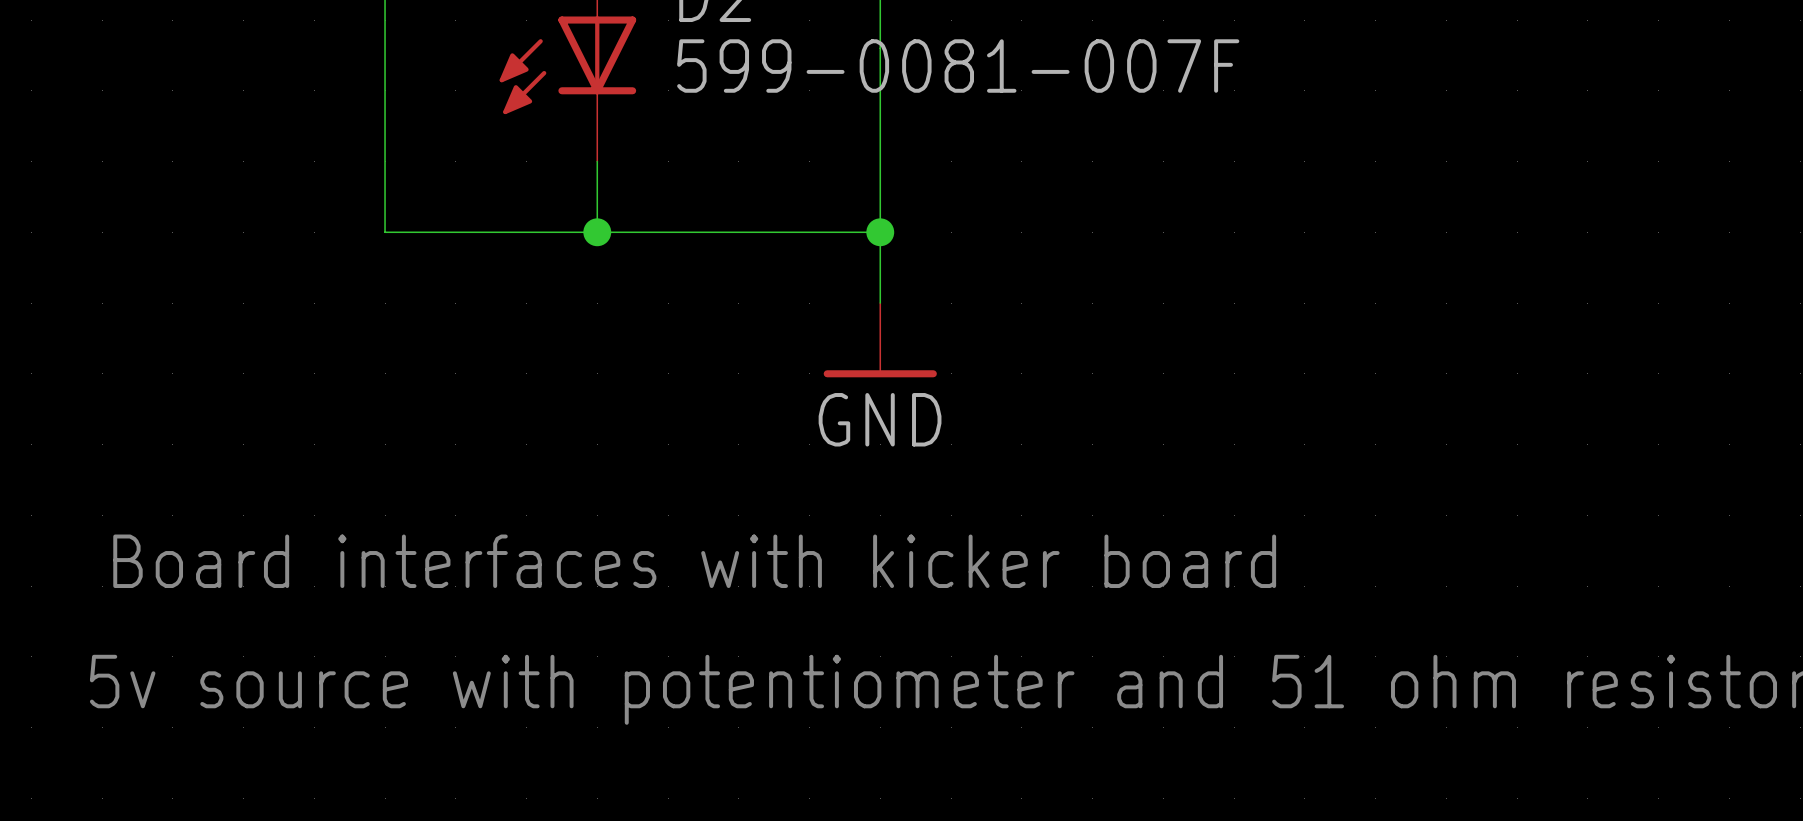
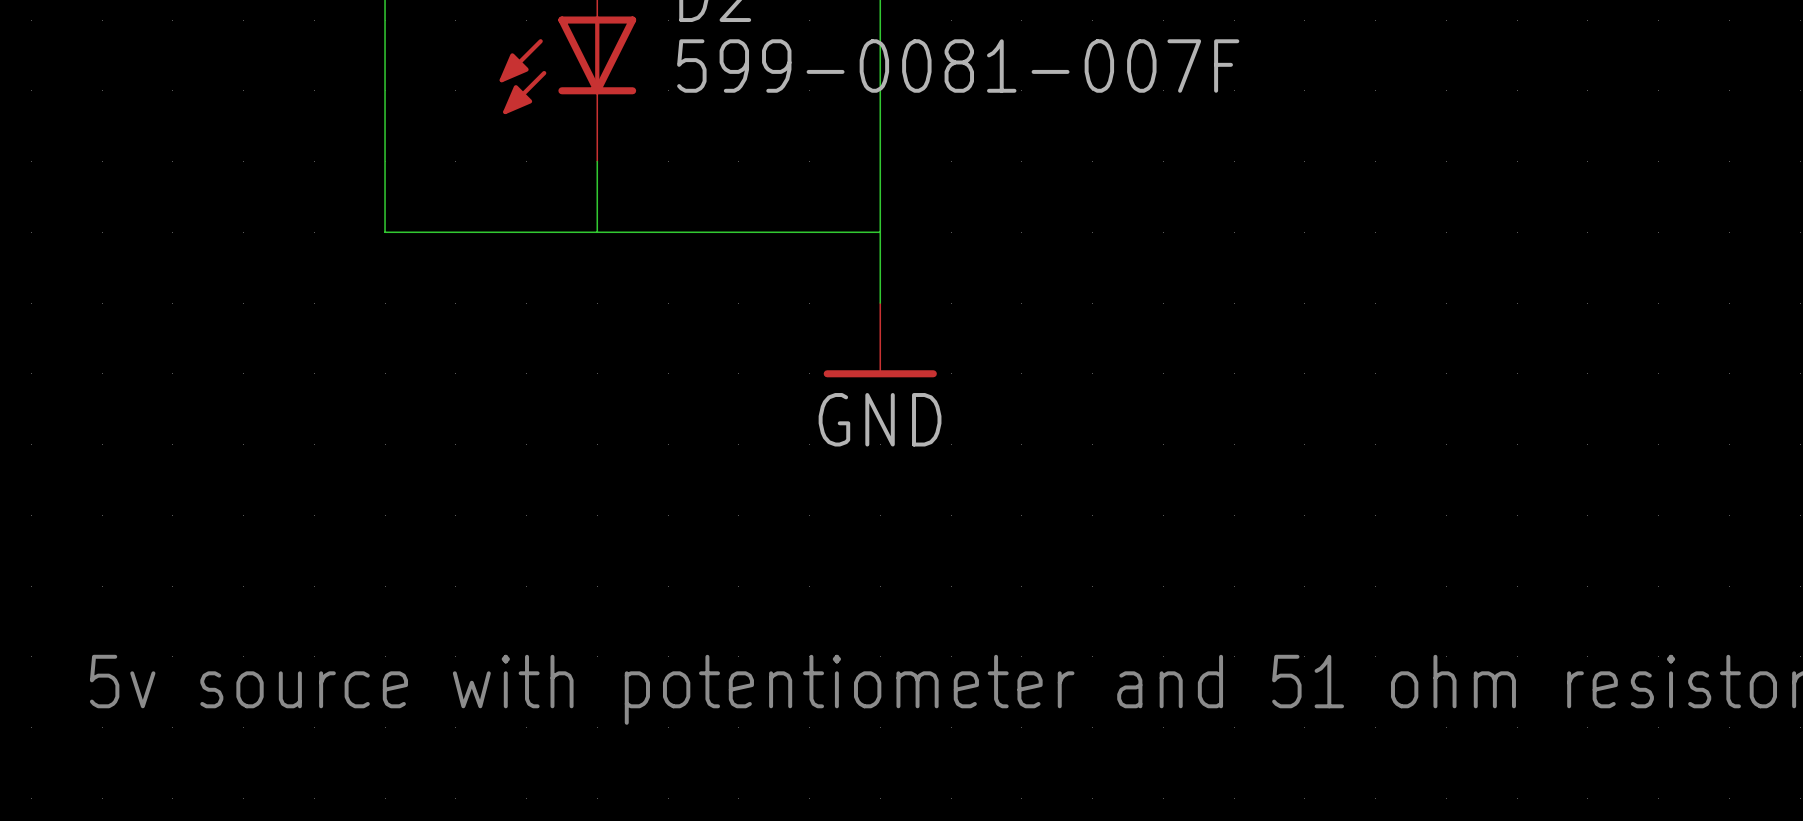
junction: (597, 232) -> none
junction: (880, 232) -> none
text: Board interfaces with kicker board (694, 561) -> none

